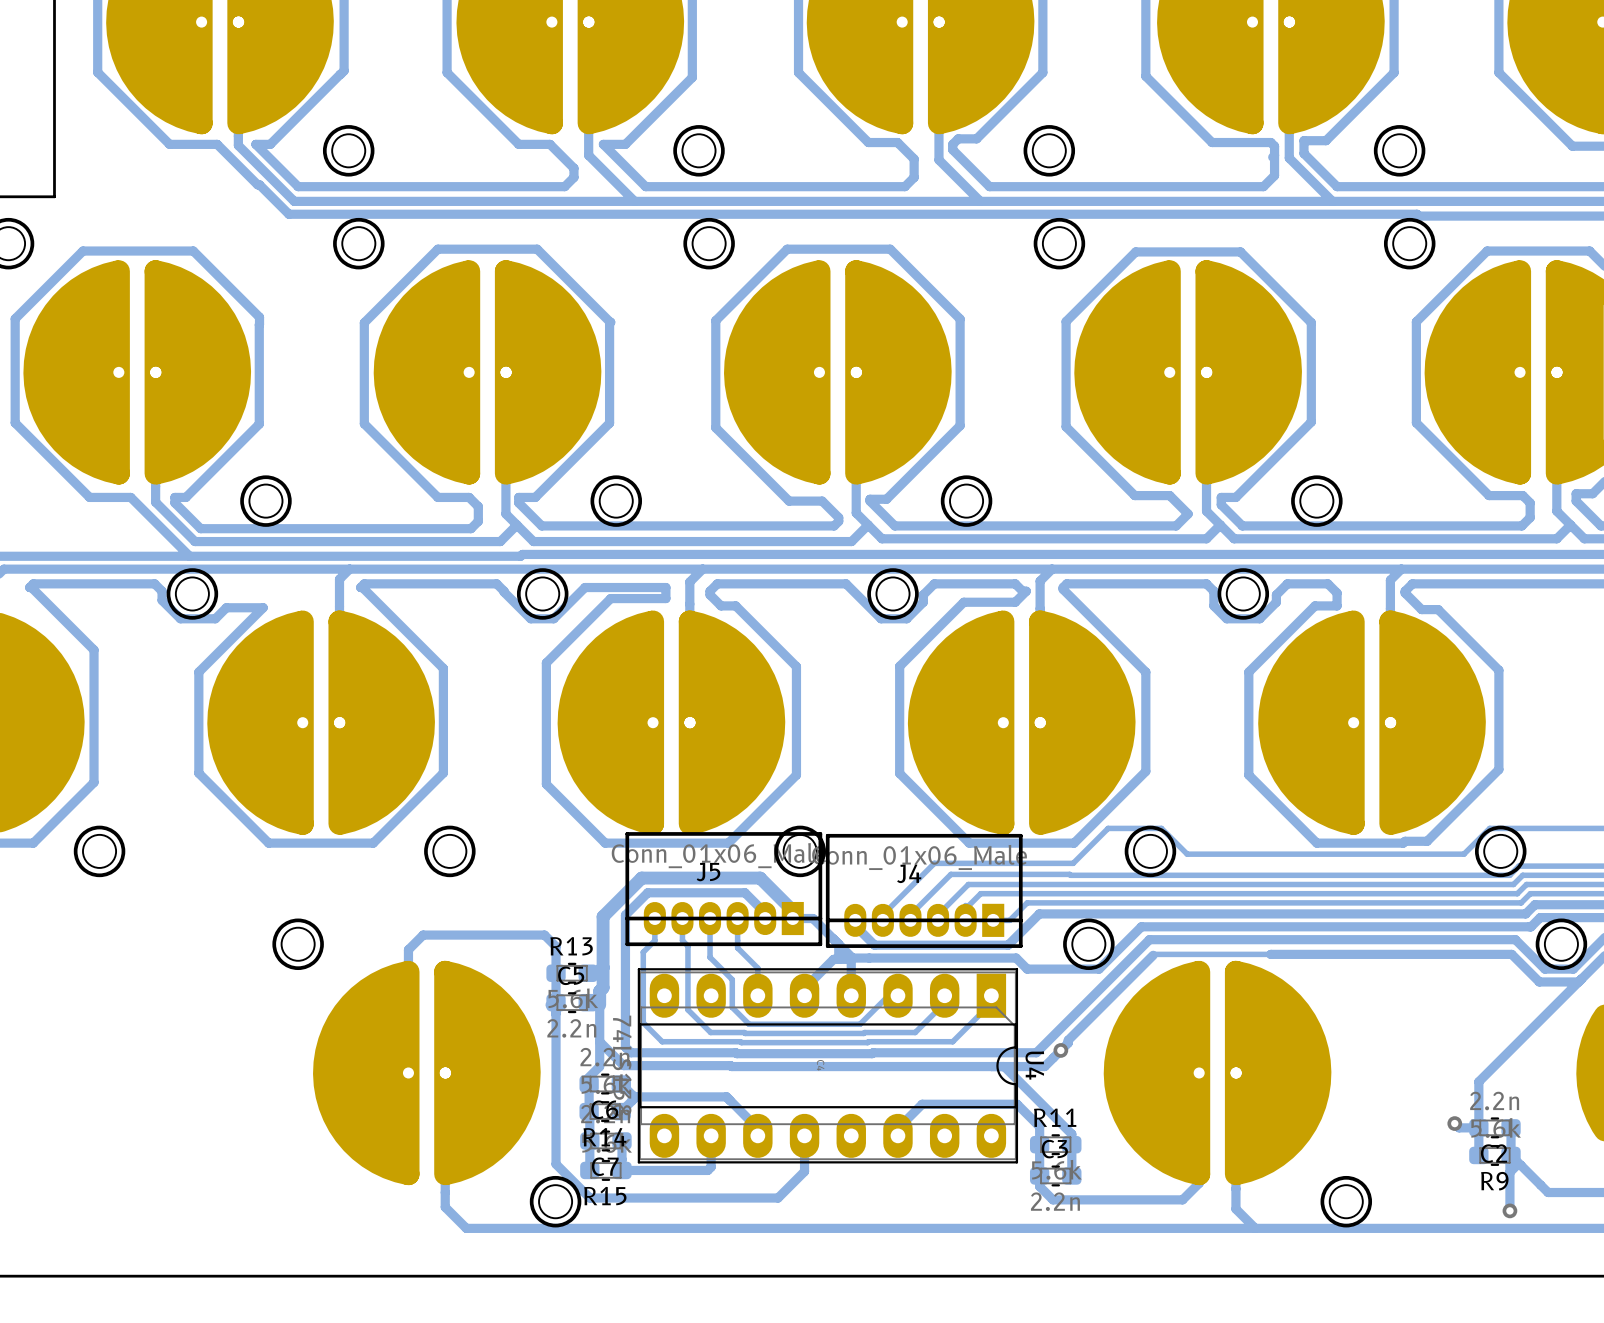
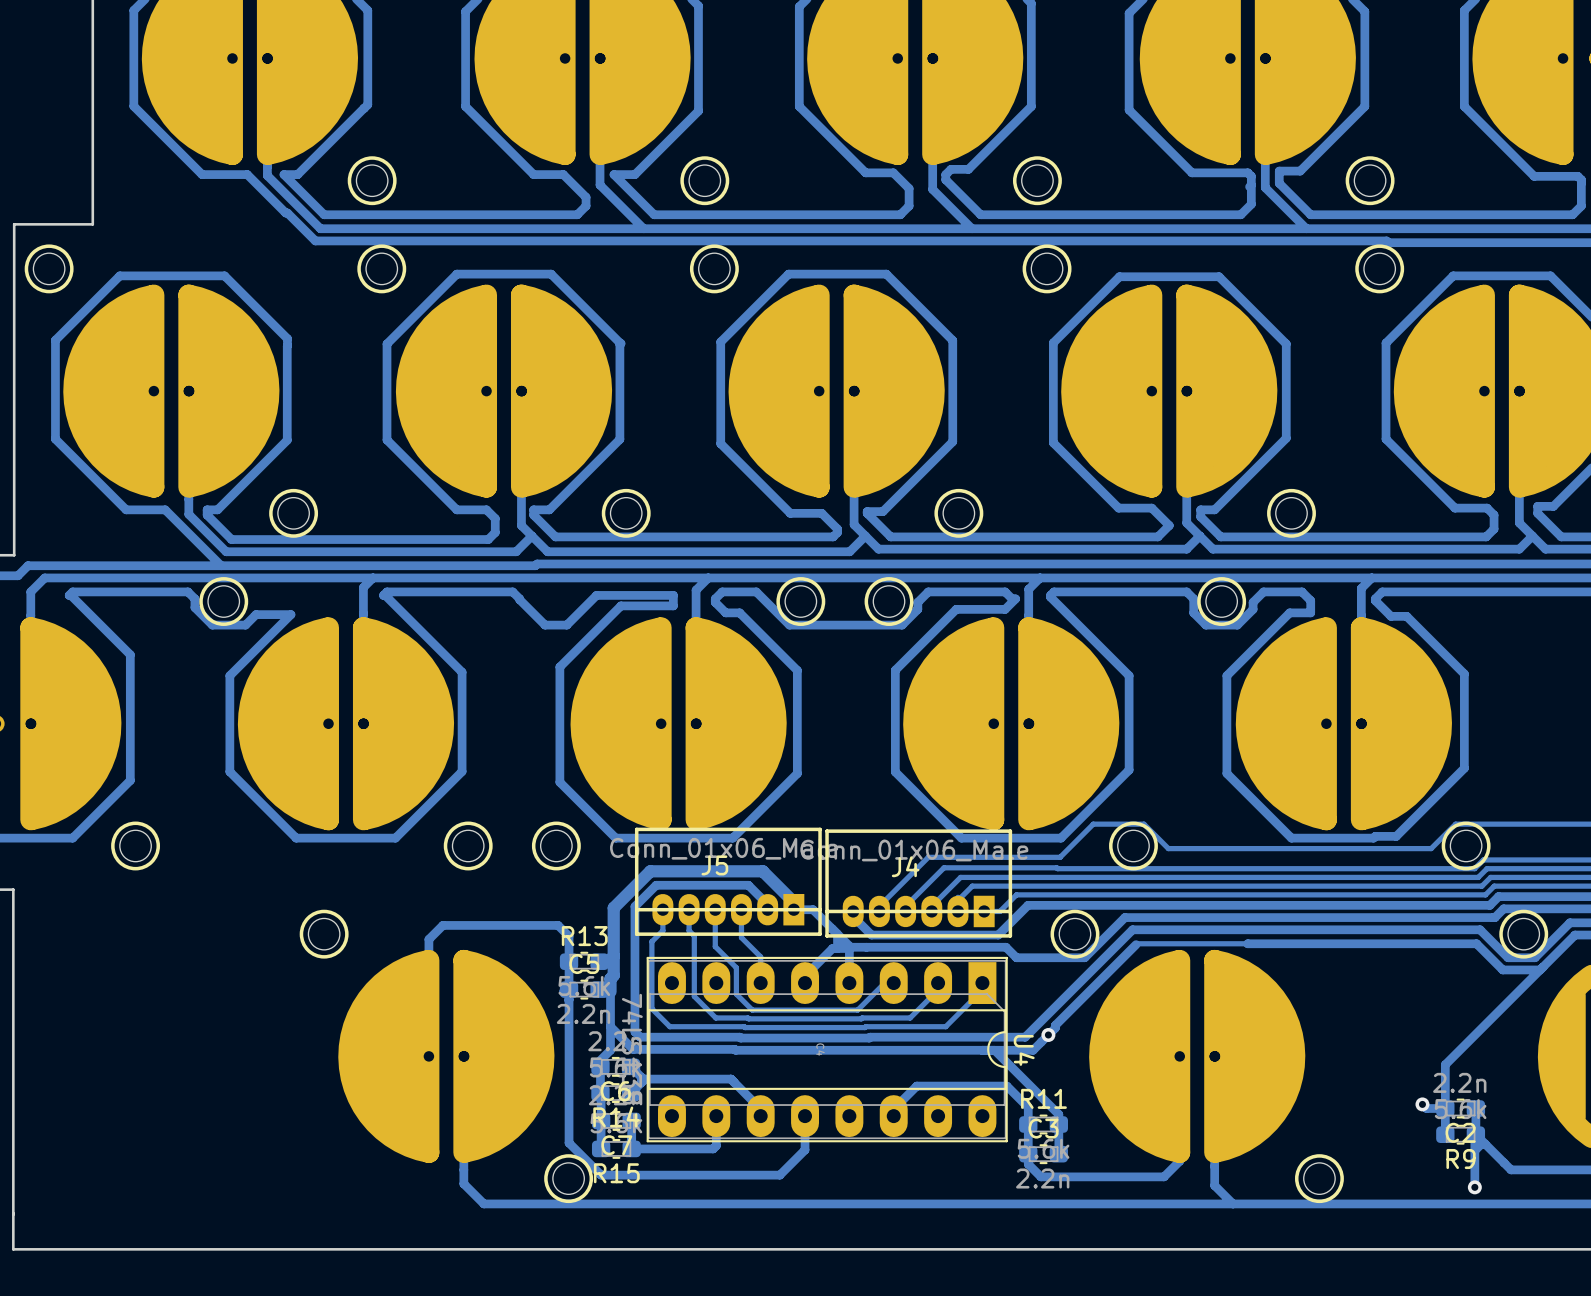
part footprint: [516, 568, 826, 878] -> [531, 577, 826, 871]
track: (753, 583) (846, 583) (881, 618) -> (756, 591) (789, 625) (877, 625)

